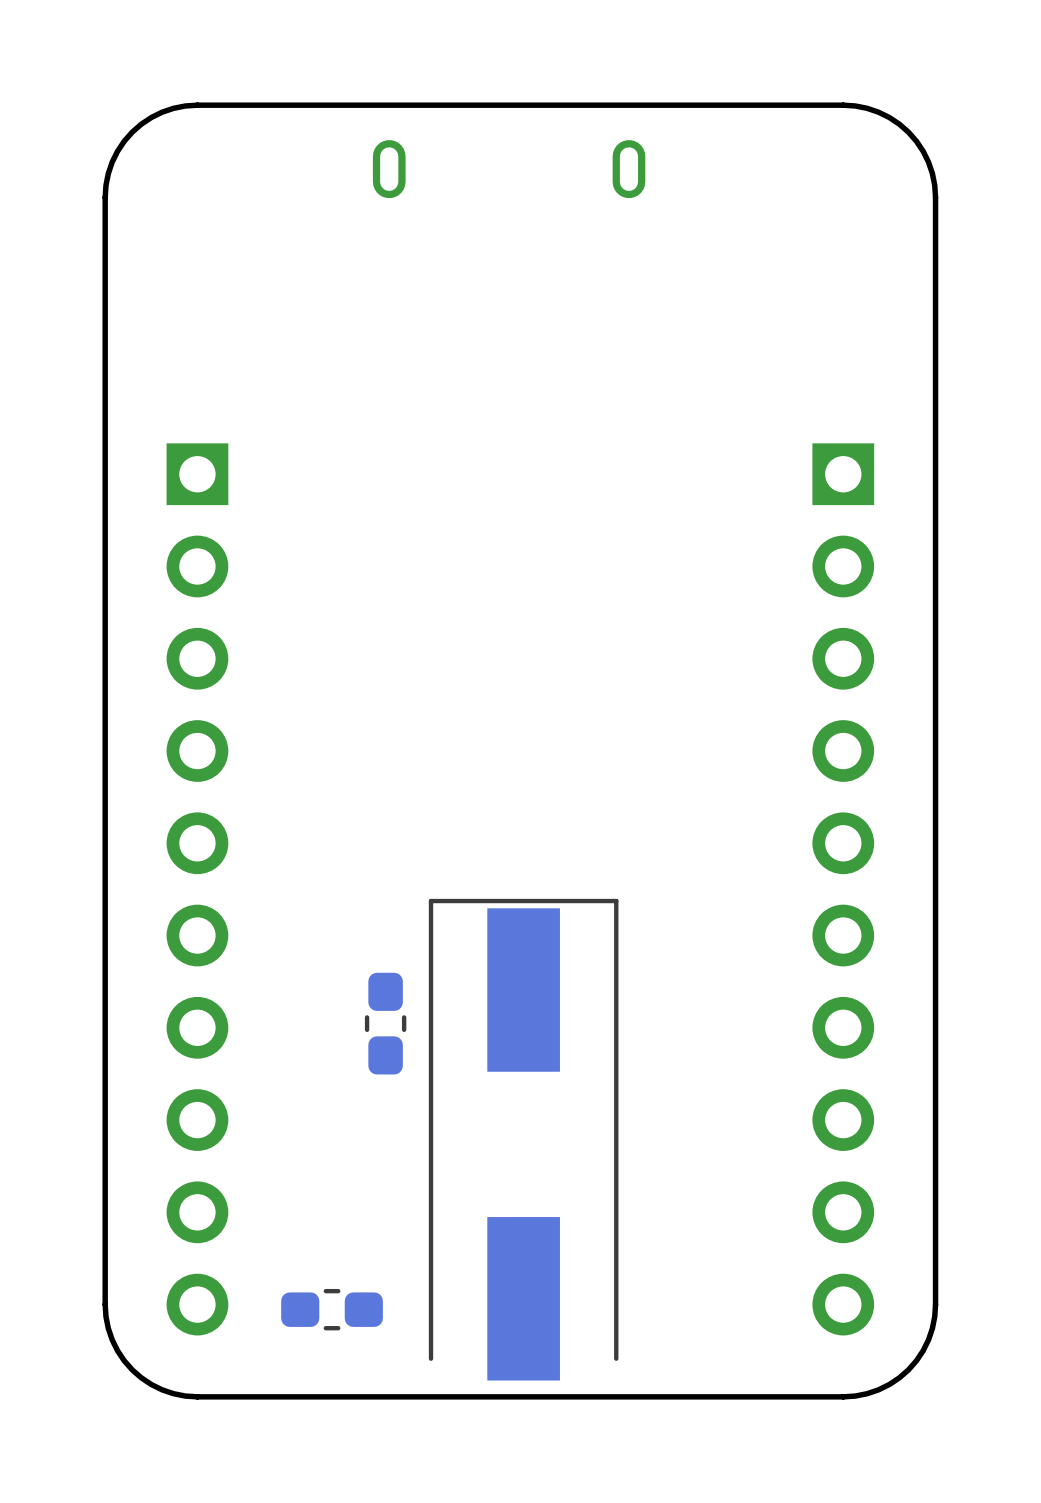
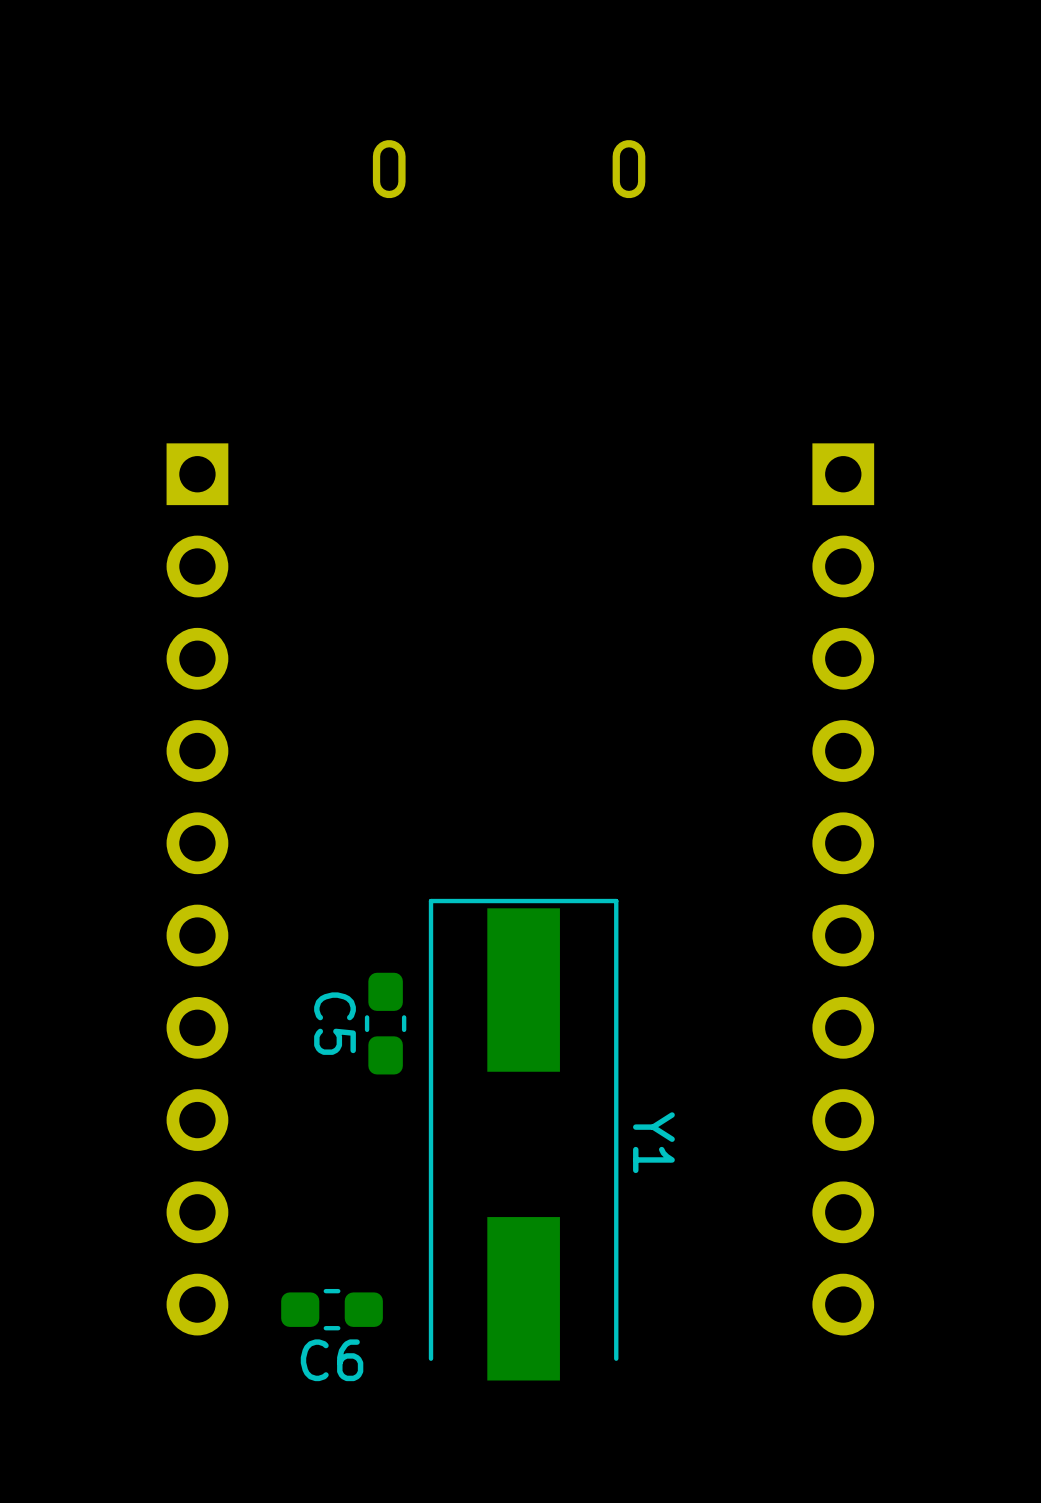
board edge: (843, 105) (197, 105) (173, 108) (151, 117) (132, 132) (117, 151) (108, 173) (105, 197) (105, 1304) (108, 1328) (117, 1350) (132, 1369) (151, 1384) (173, 1393) (197, 1396) (843, 1396) (867, 1393) (889, 1384) (908, 1369) (923, 1350) (932, 1328) (935, 1304) (935, 197) (932, 173) (928, 162) (916, 141) (908, 132) (899, 124) (878, 112) (867, 108) (843, 105) -> none
C5 name: none -> C5 (335, 1023)
Y1 name: none -> Y1 (653, 1142)
C6 name: none -> C6 (332, 1360)

